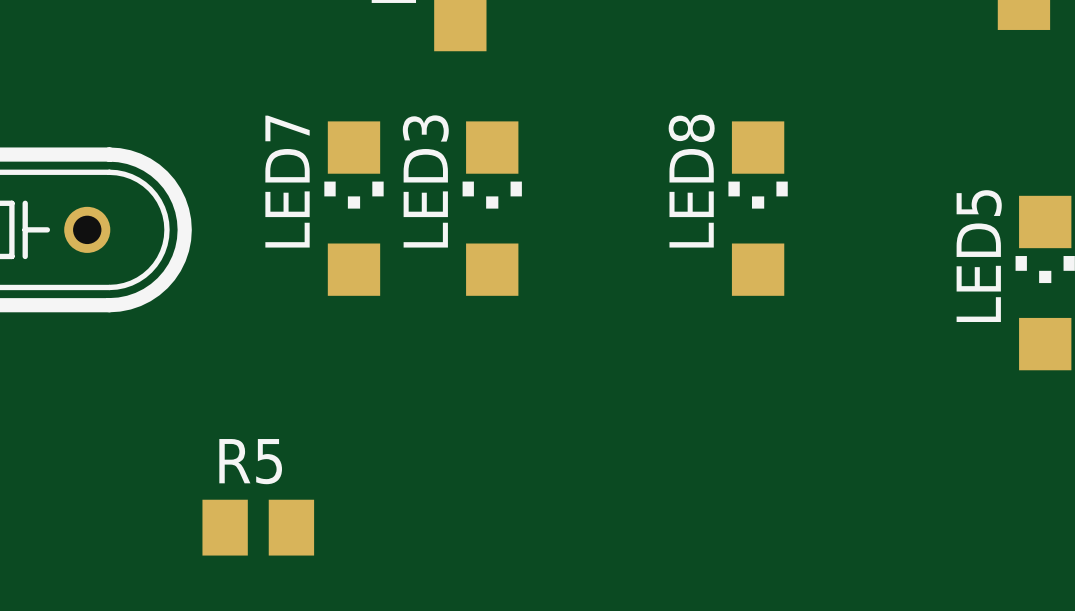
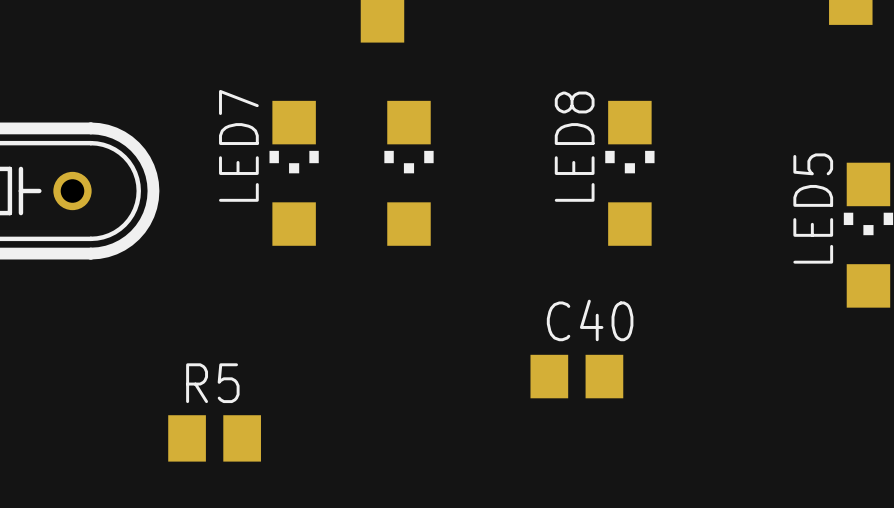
LED3 name: LED3 (425, 181) -> none
C40: none -> (576, 376)

